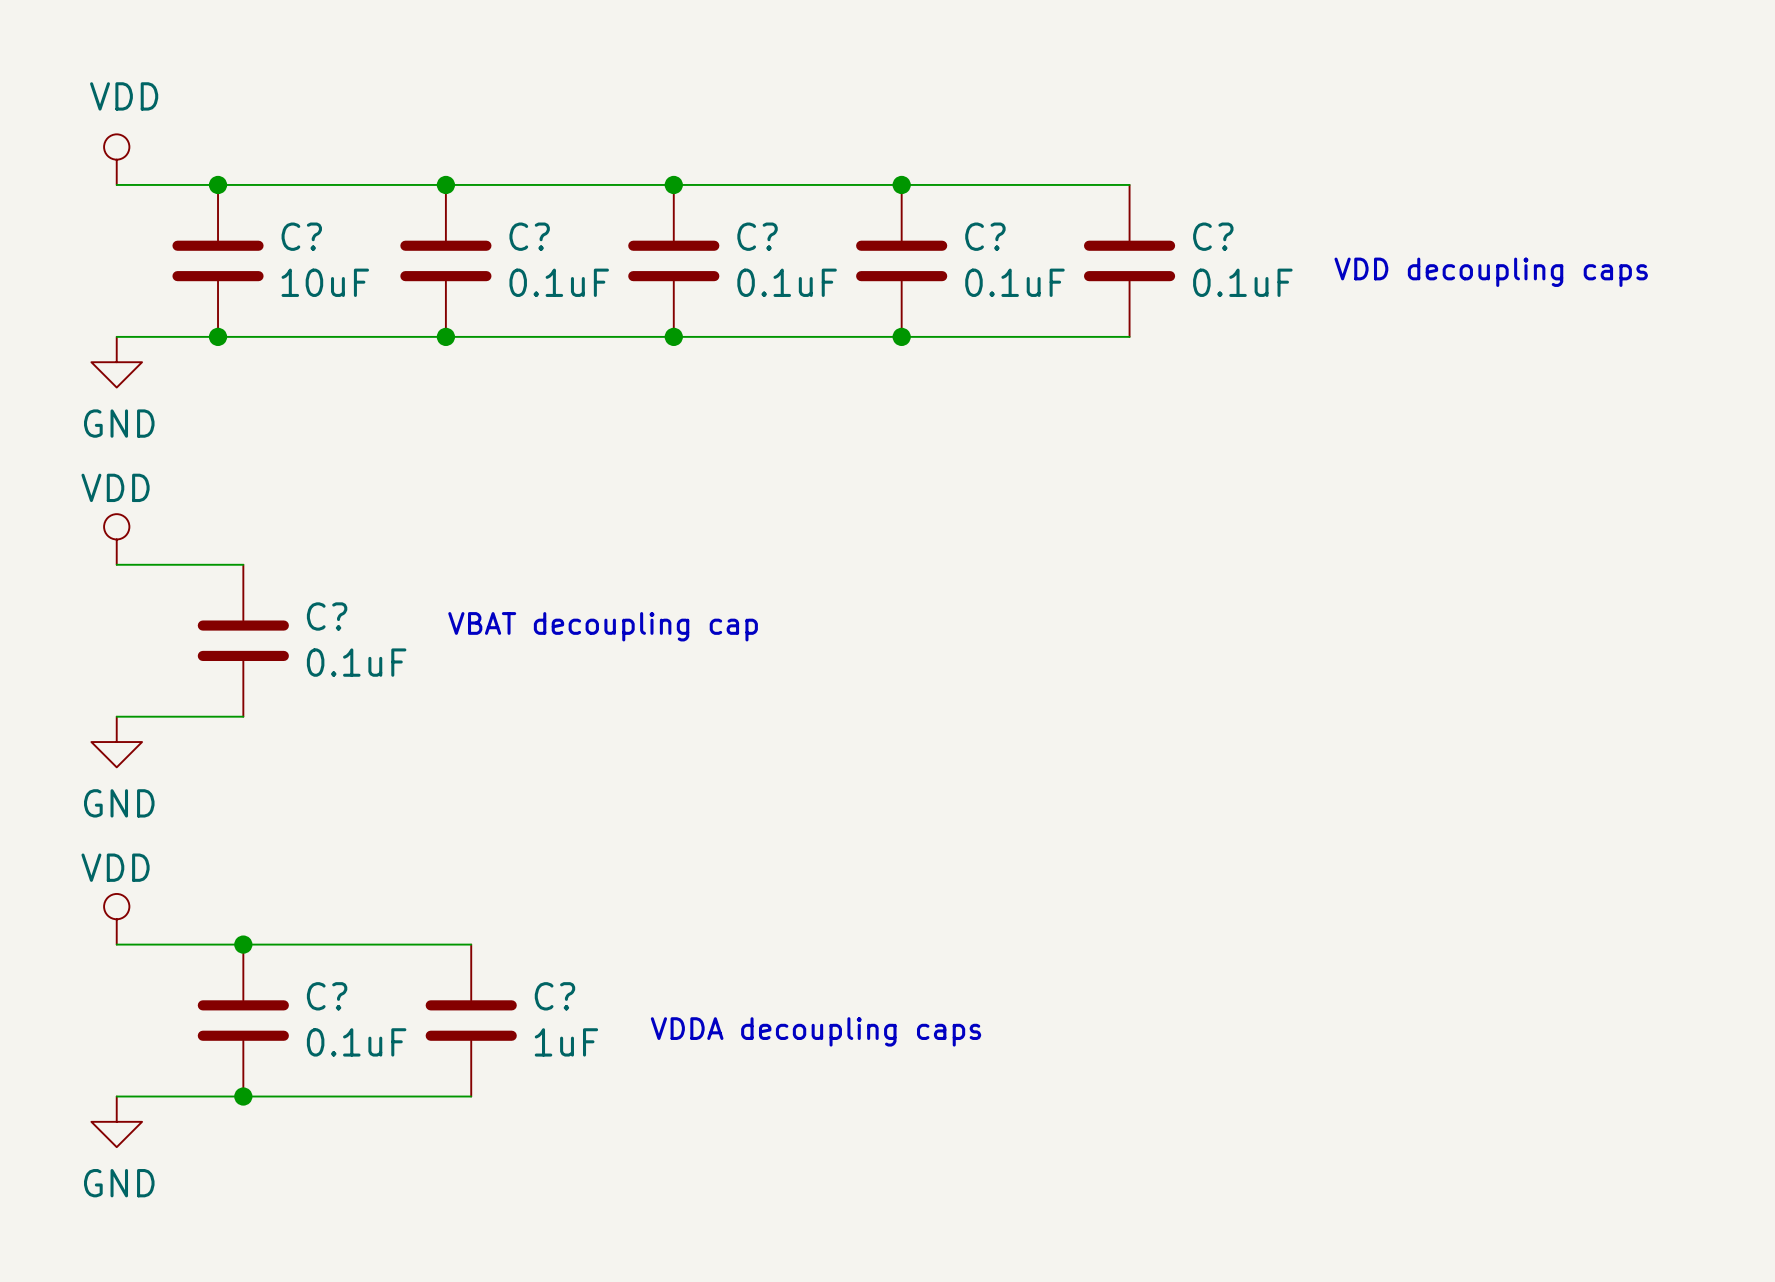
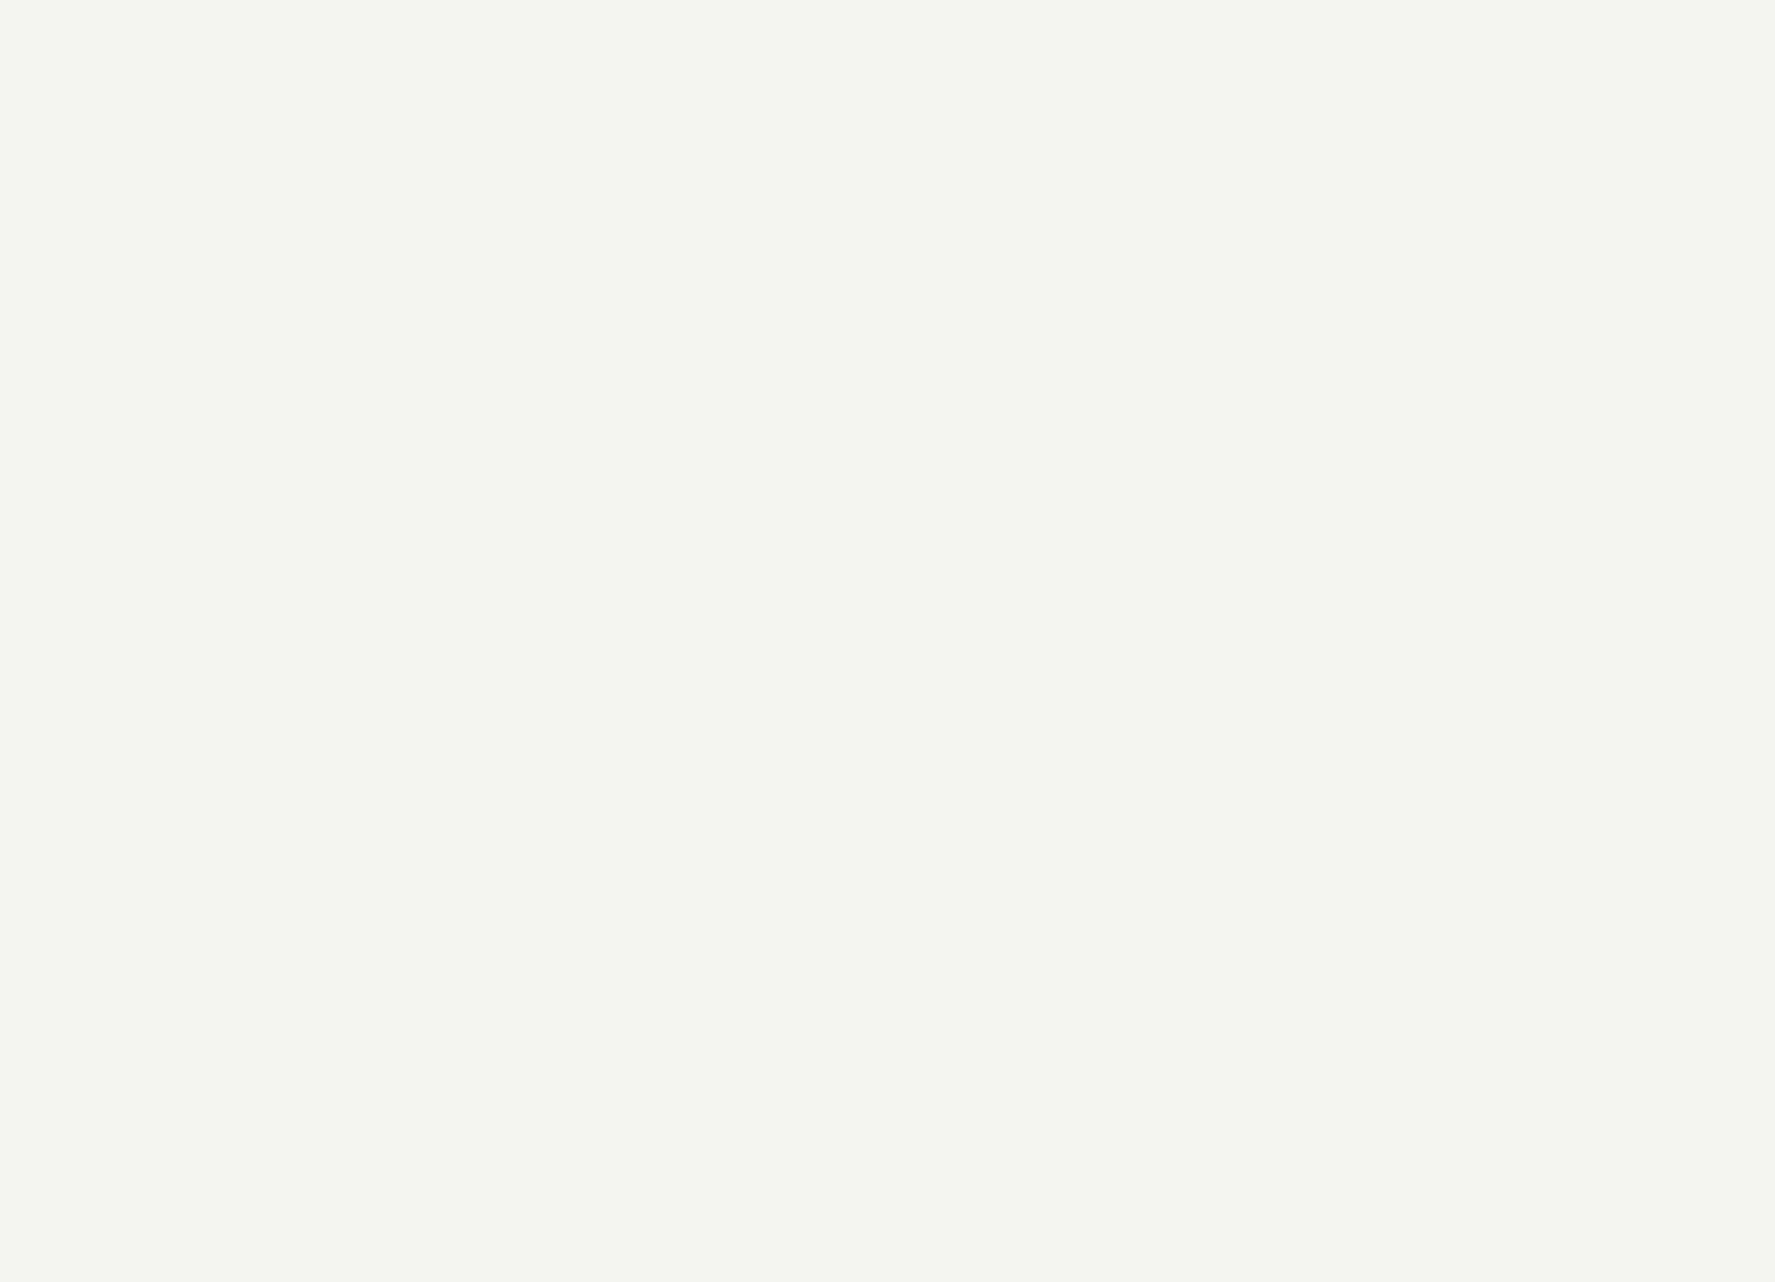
power symbol: VDD (116, 159) -> none
wire: (116, 184) (1129, 184) -> none
junction: (218, 184) -> none
junction: (445, 184) -> none
junction: (673, 184) -> none
junction: (901, 184) -> none
C?: 10uF (218, 260) -> none
C?: 0.1uF (445, 260) -> none
C?: 0.1uF (673, 260) -> none
C?: 0.1uF (901, 260) -> none
C?: 0.1uF (1129, 260) -> none
text: VDD decoupling caps (1491, 272) -> none
wire: (116, 336) (1129, 336) -> none
junction: (218, 336) -> none
junction: (445, 336) -> none
junction: (673, 336) -> none
junction: (901, 336) -> none
power symbol: GND (116, 362) -> none
power symbol: VDD (116, 539) -> none
wire: (116, 564) (243, 564) -> none
text: VBAT decoupling cap (603, 626) -> none
C?: 0.1uF (243, 640) -> none
wire: (116, 716) (243, 716) -> none
power symbol: GND (116, 742) -> none
power symbol: VDD (116, 919) -> none
wire: (116, 944) (471, 944) -> none
junction: (243, 944) -> none
C?: 0.1uF (243, 1020) -> none
C?: 1uF (471, 1020) -> none
text: VDDA decoupling caps (815, 1031) -> none
wire: (116, 1096) (471, 1096) -> none
junction: (243, 1096) -> none
power symbol: GND (116, 1121) -> none

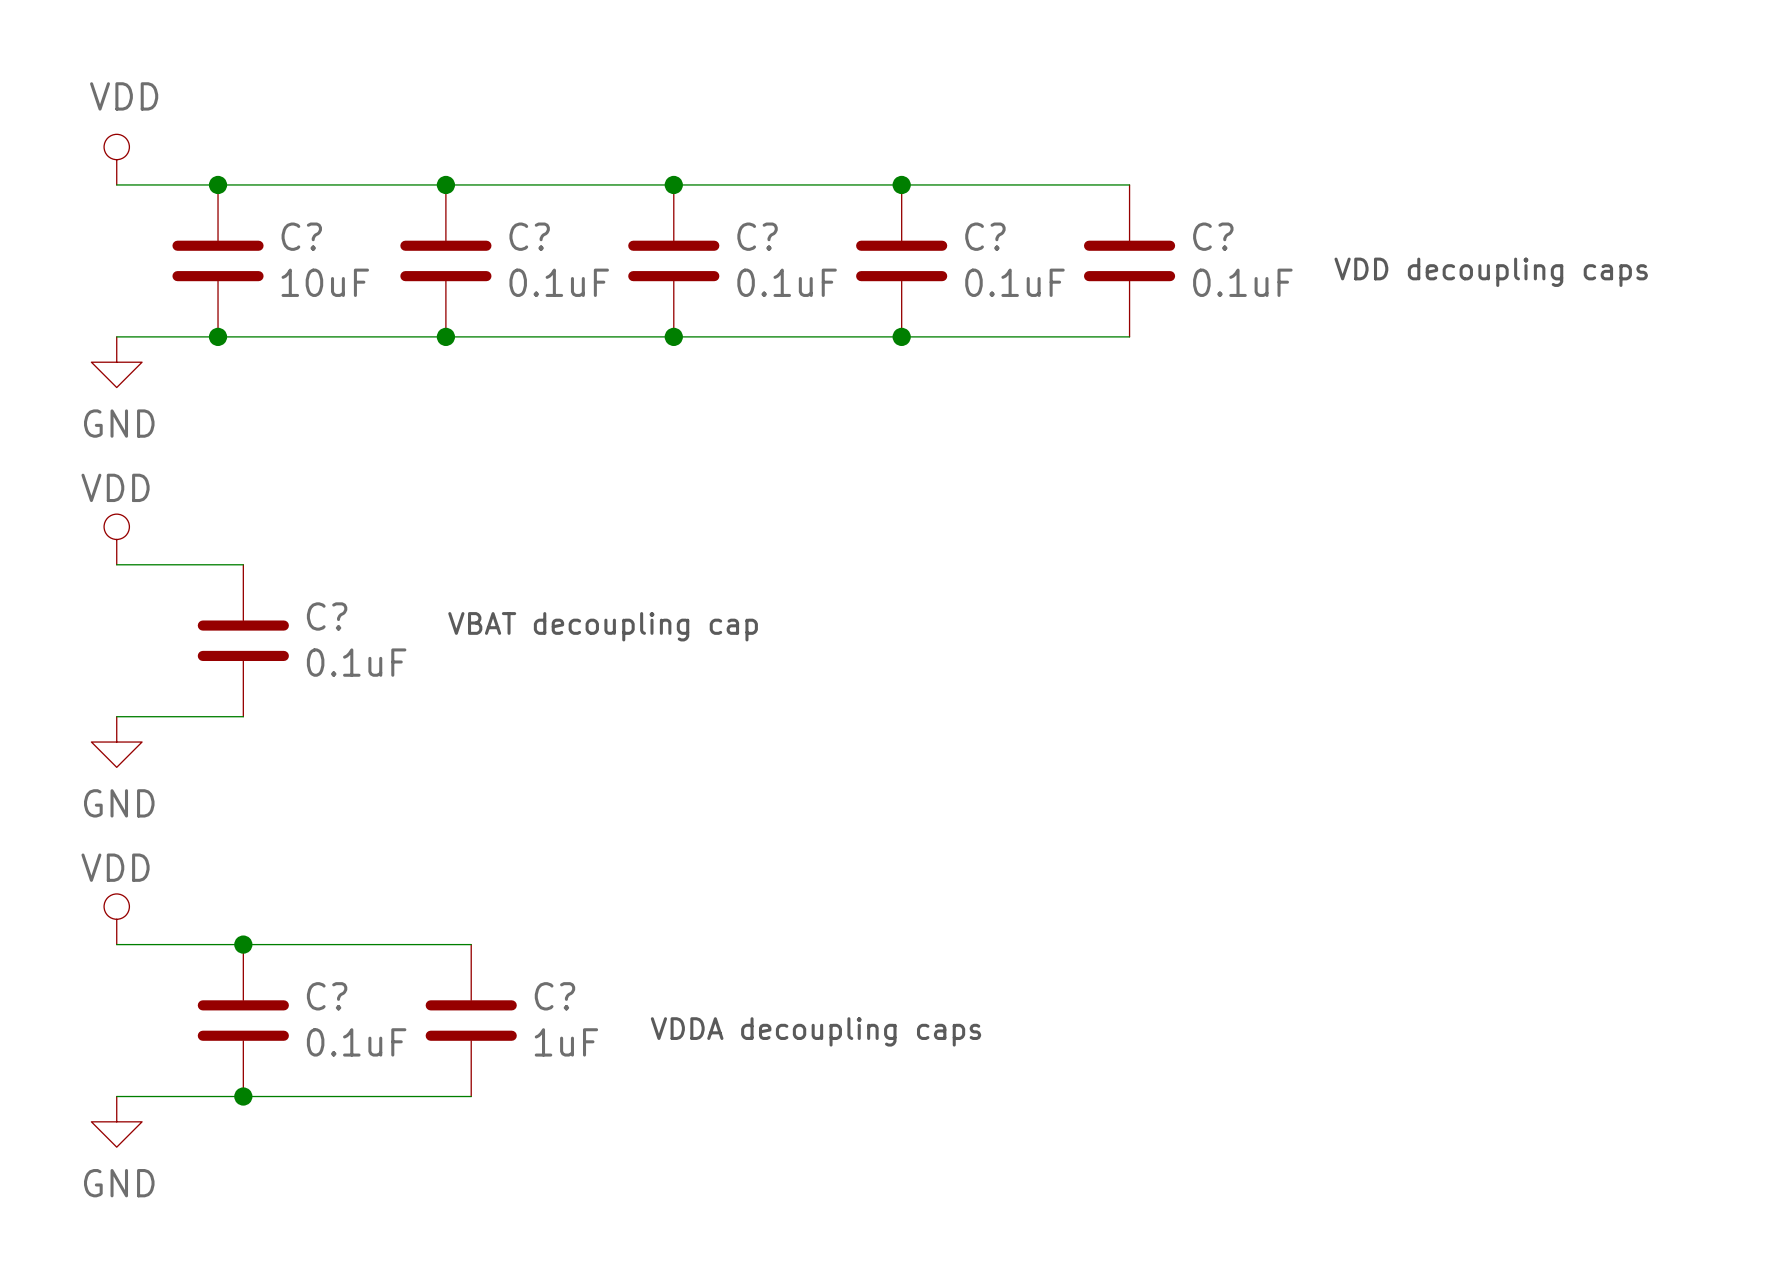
power symbol: none -> VDD (116, 159)
wire: none -> (116, 184) (1129, 184)
junction: none -> (218, 184)
junction: none -> (445, 184)
junction: none -> (673, 184)
junction: none -> (901, 184)
C?: none -> 10uF (218, 260)
C?: none -> 0.1uF (445, 260)
C?: none -> 0.1uF (673, 260)
C?: none -> 0.1uF (901, 260)
C?: none -> 0.1uF (1129, 260)
text: none -> VDD decoupling caps (1491, 272)
wire: none -> (116, 336) (1129, 336)
junction: none -> (218, 336)
junction: none -> (445, 336)
junction: none -> (673, 336)
junction: none -> (901, 336)
power symbol: none -> GND (116, 362)
power symbol: none -> VDD (116, 539)
wire: none -> (116, 564) (243, 564)
text: none -> VBAT decoupling cap (603, 626)
C?: none -> 0.1uF (243, 640)
wire: none -> (116, 716) (243, 716)
power symbol: none -> GND (116, 742)
power symbol: none -> VDD (116, 919)
wire: none -> (116, 944) (471, 944)
junction: none -> (243, 944)
C?: none -> 0.1uF (243, 1020)
C?: none -> 1uF (471, 1020)
text: none -> VDDA decoupling caps (815, 1031)
wire: none -> (116, 1096) (471, 1096)
junction: none -> (243, 1096)
power symbol: none -> GND (116, 1121)

